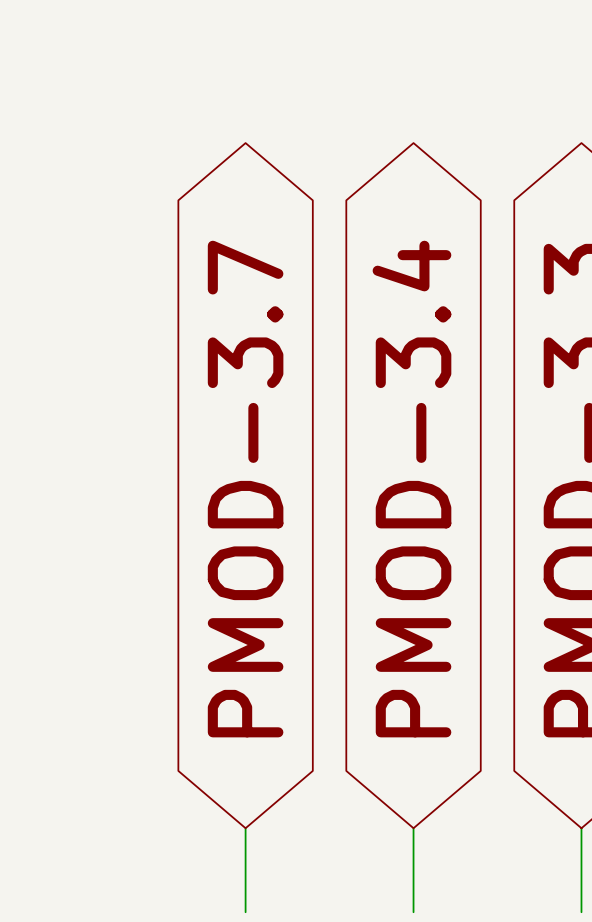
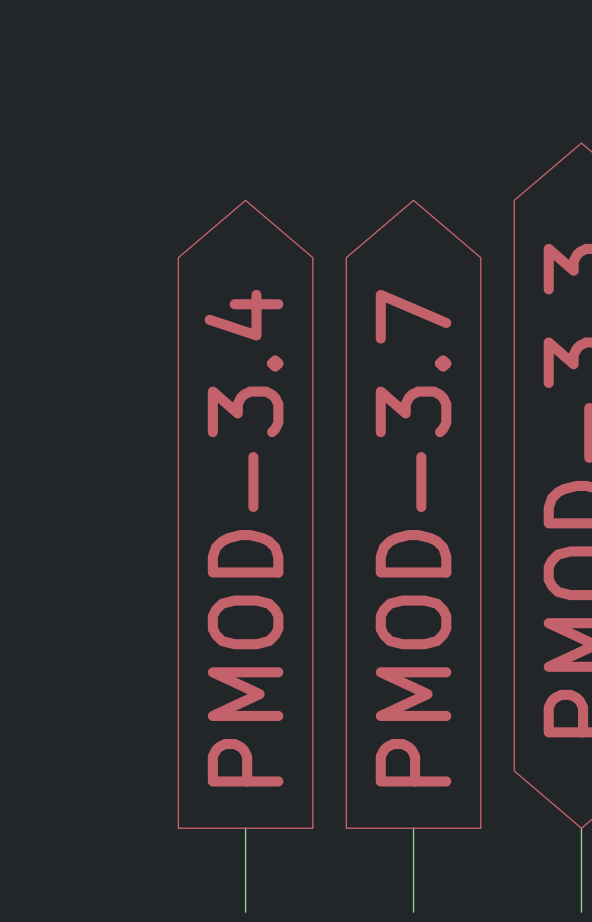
global label shape: bidirectional (245, 489) -> output (244, 538)
global label: PMOD-3.7 (245, 489) -> PMOD-3.4 (244, 538)
global label shape: bidirectional (411, 489) -> output (413, 538)
global label: PMOD-3.4 (411, 489) -> PMOD-3.7 (413, 538)

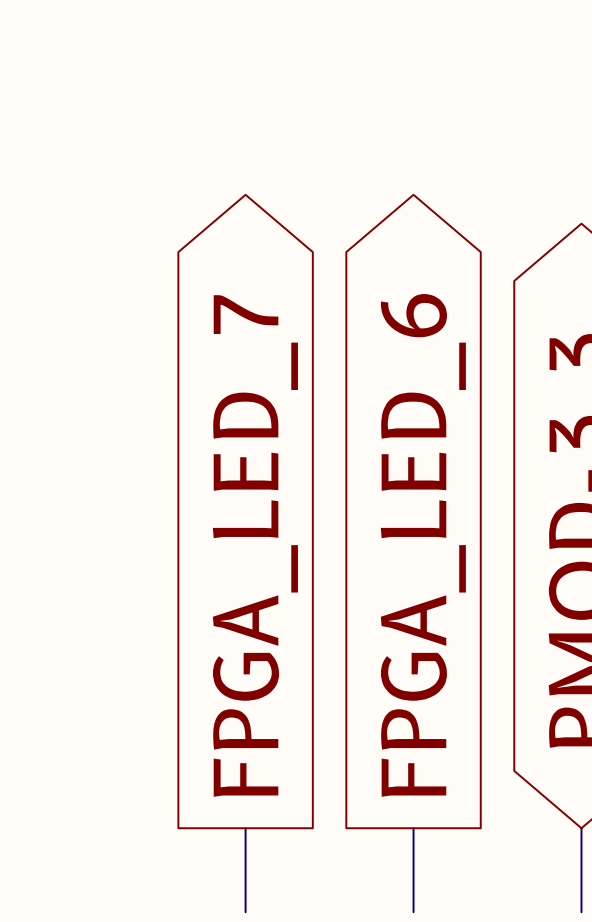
global label: PMOD-3.4 (244, 538) -> FPGA_LED_7 (255, 545)
global label: PMOD-3.7 (413, 538) -> FPGA_LED_6 (423, 545)

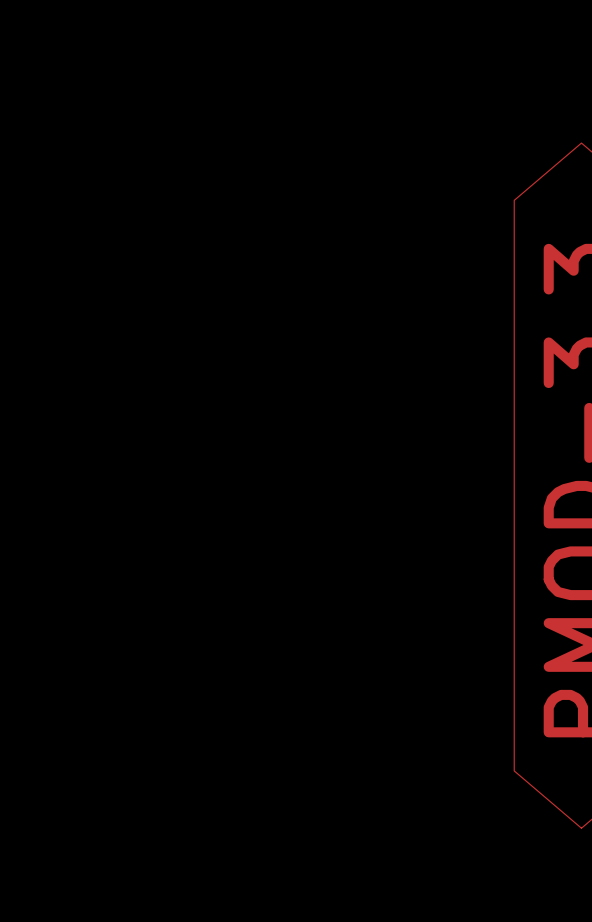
global label: FPGA_LED_7 (255, 545) -> none
global label: FPGA_LED_6 (423, 545) -> none
wire: (245, 828) (245, 912) -> none
wire: (413, 828) (413, 912) -> none
wire: (581, 828) (581, 912) -> none

